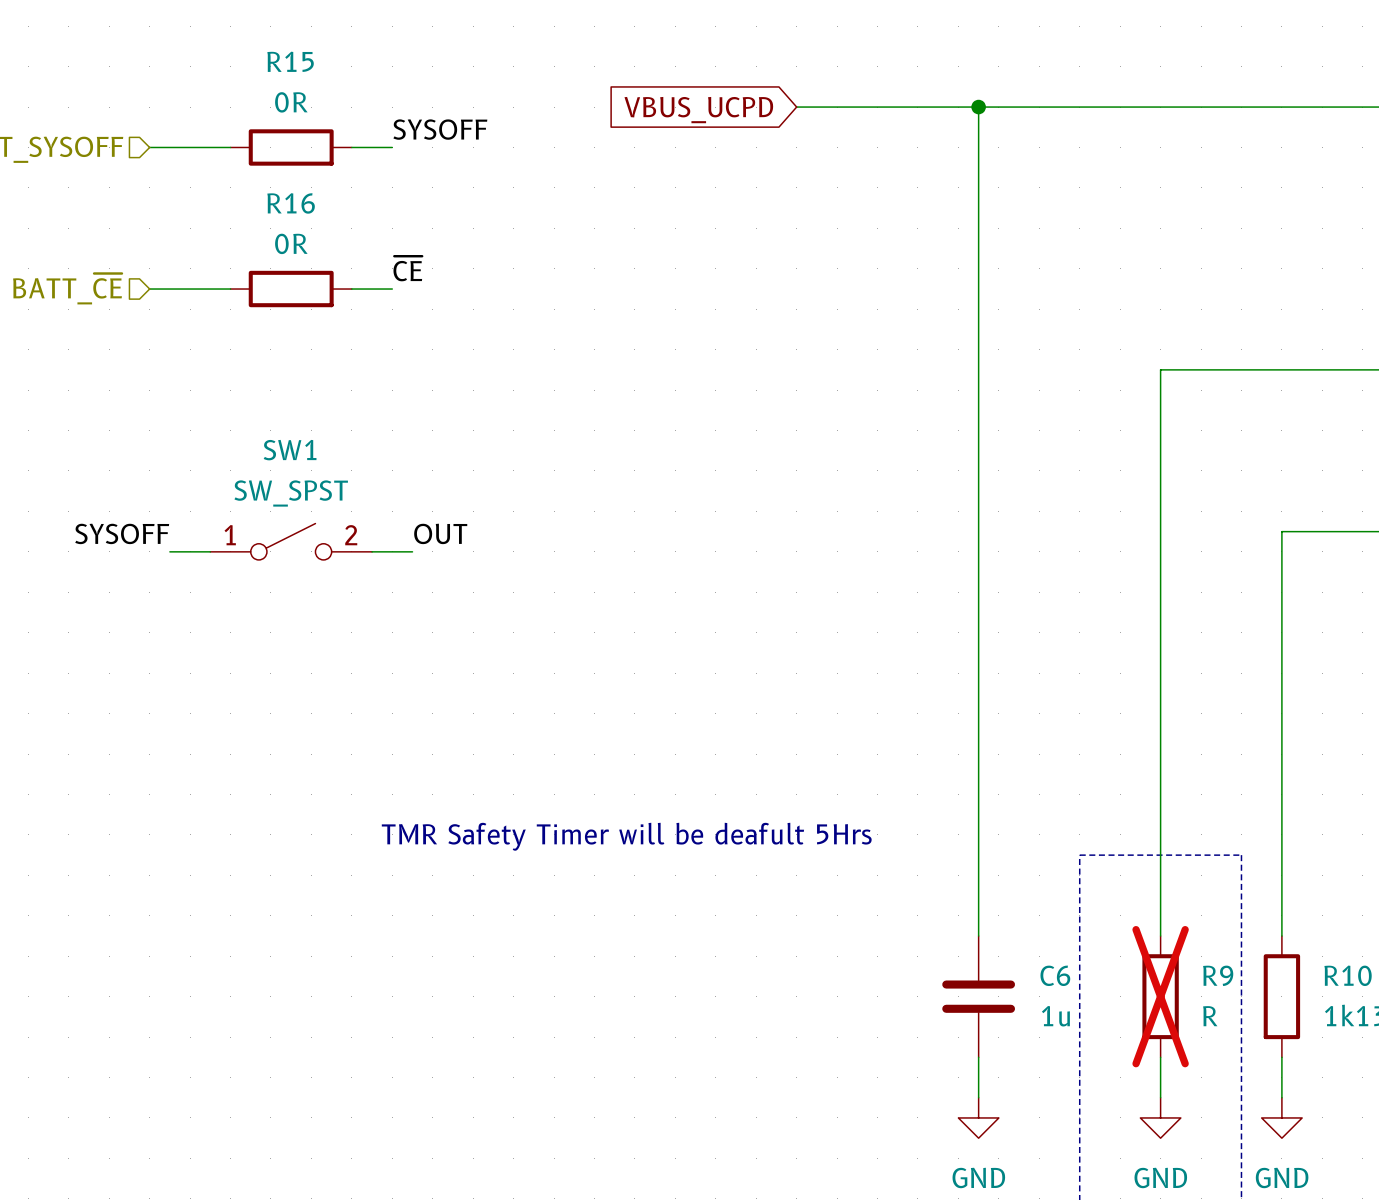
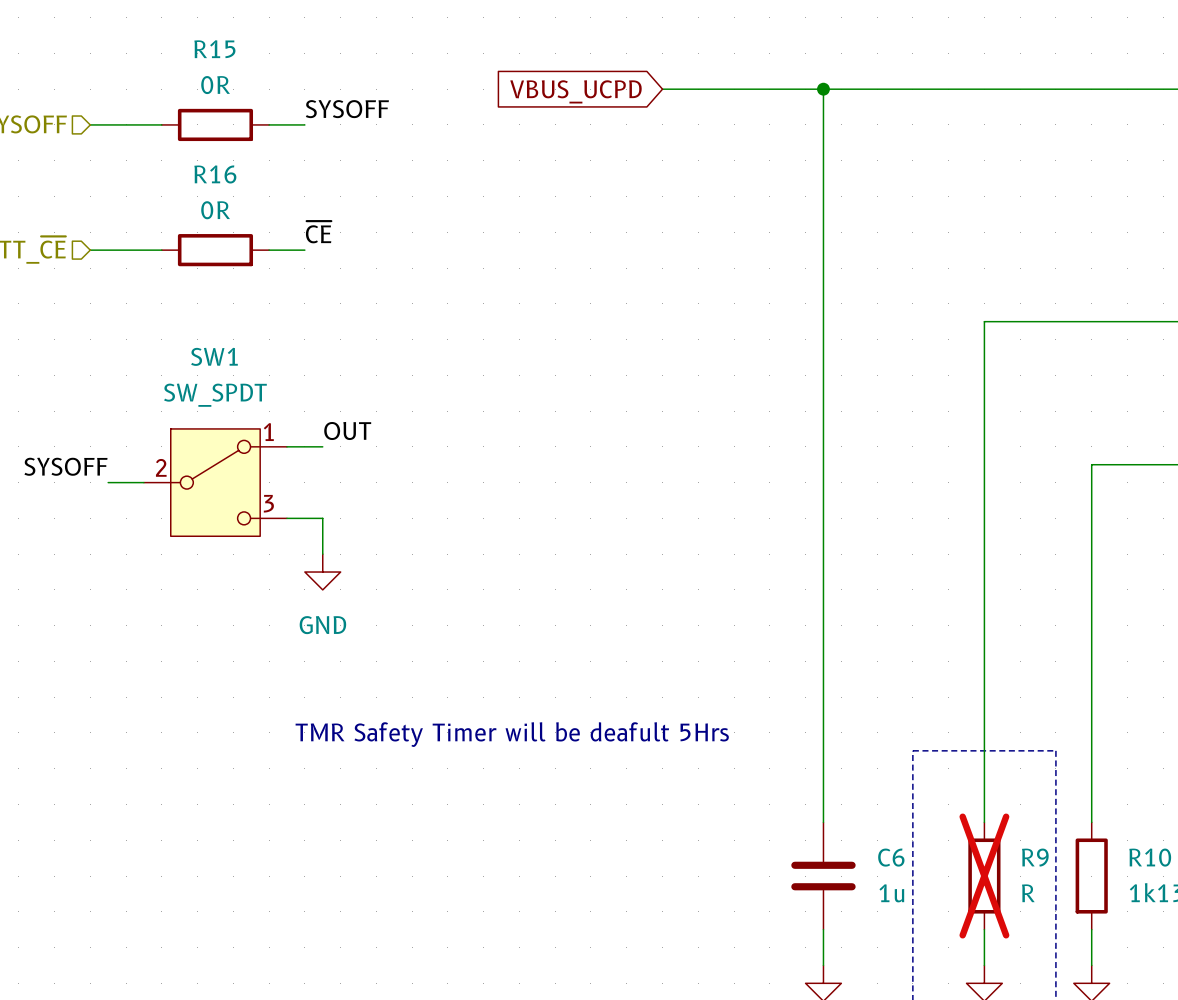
SW1 name position: SW1 (290, 450) -> SW1 (214, 356)
SW1 value: SW_SPST (291, 493) -> SW_SPDT (215, 395)
SW1 symbol: [210, 523, 373, 560] -> [143, 428, 287, 537]
label position: OUT (440, 533) -> OUT (347, 430)
wire: (372, 551) (412, 551) -> (286, 446) (322, 446)
wire: none -> (286, 518) (322, 518) (322, 554)
power symbol: none -> GND (322, 572)

